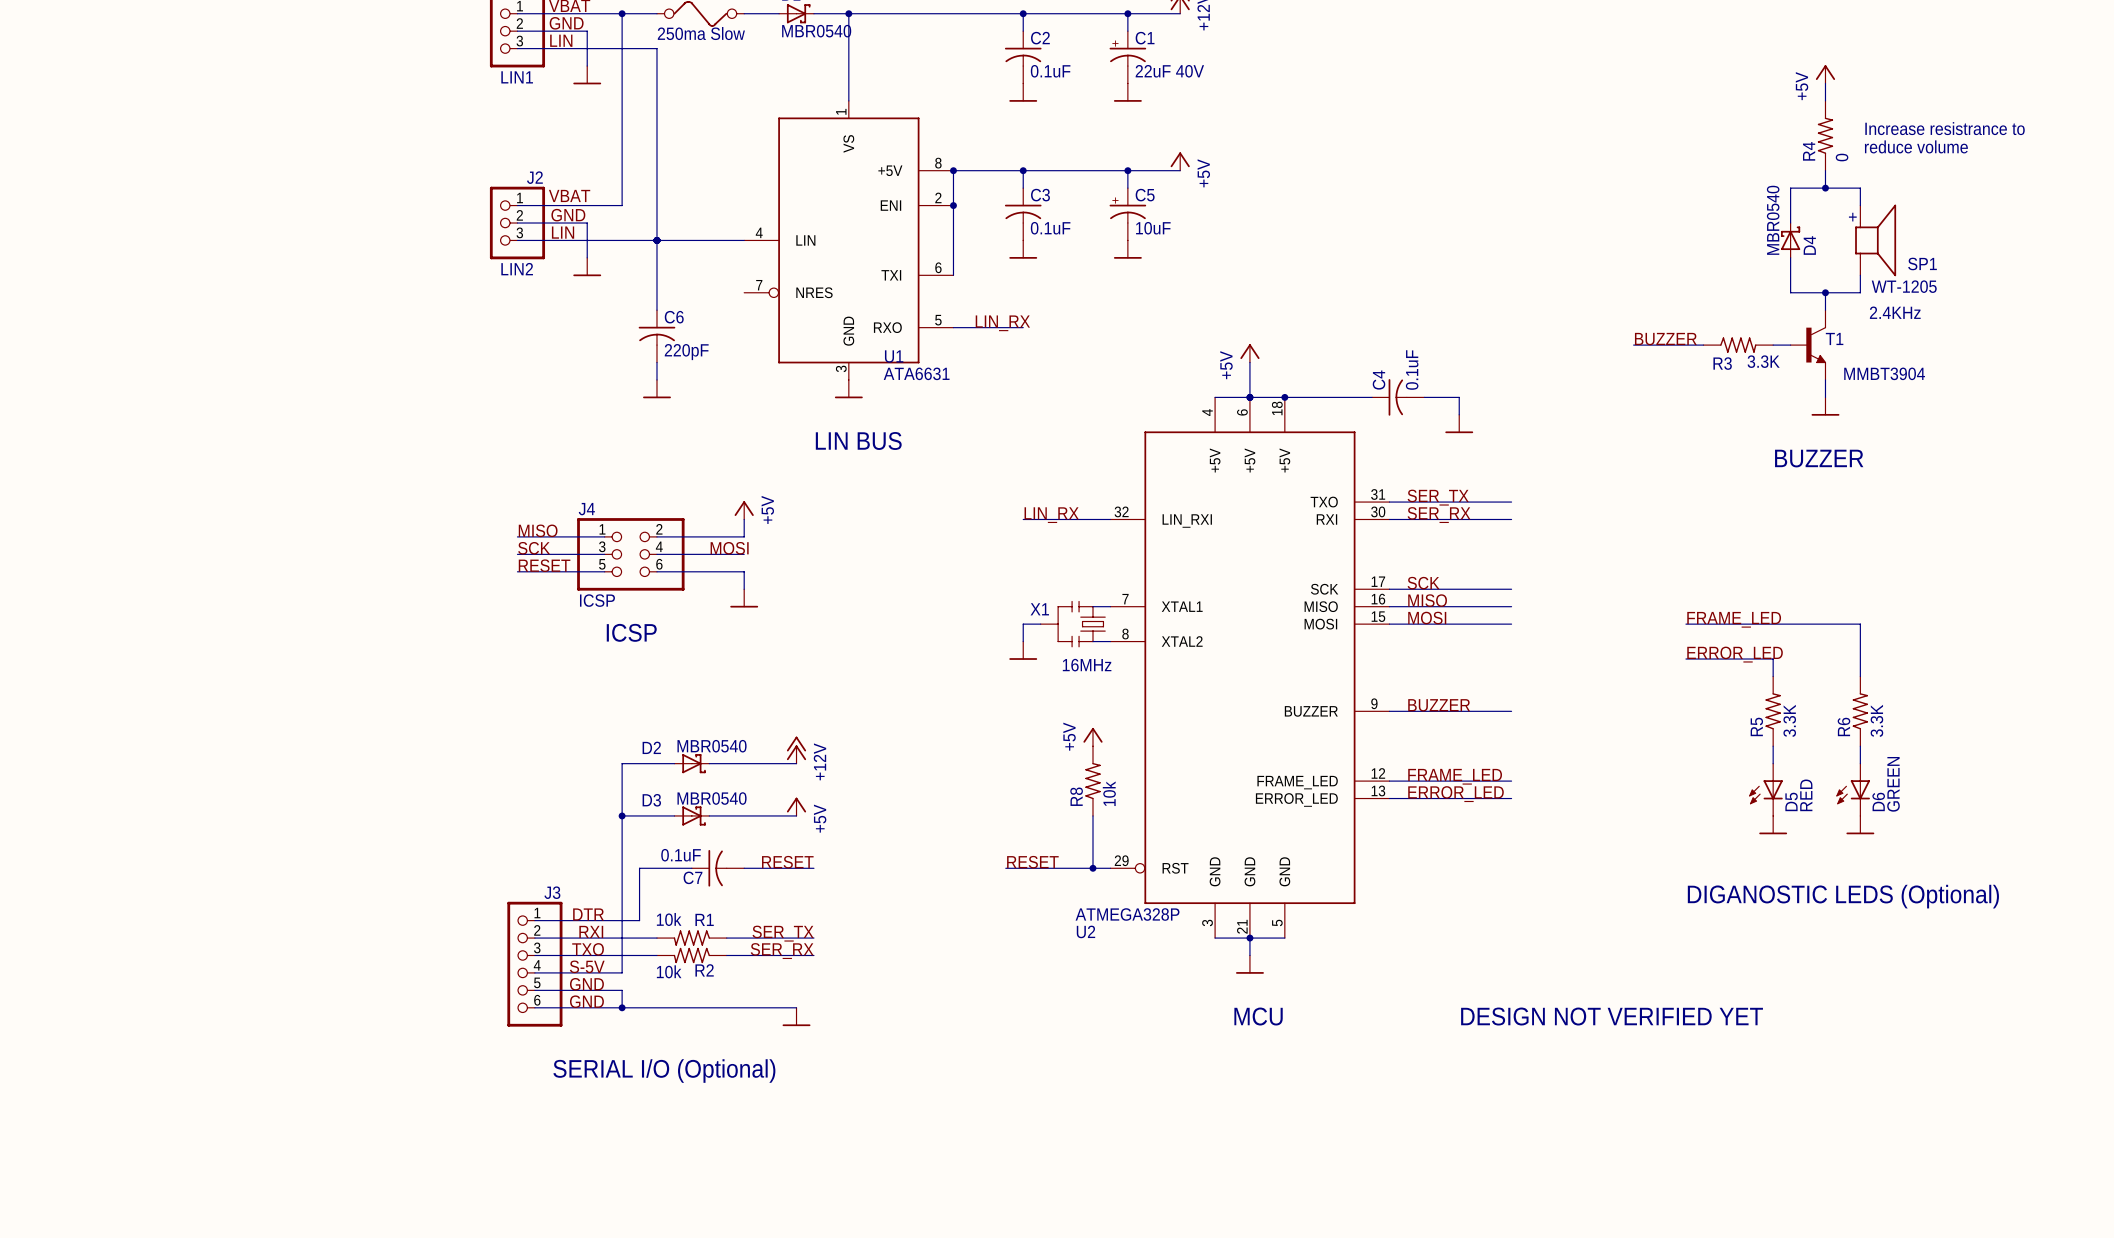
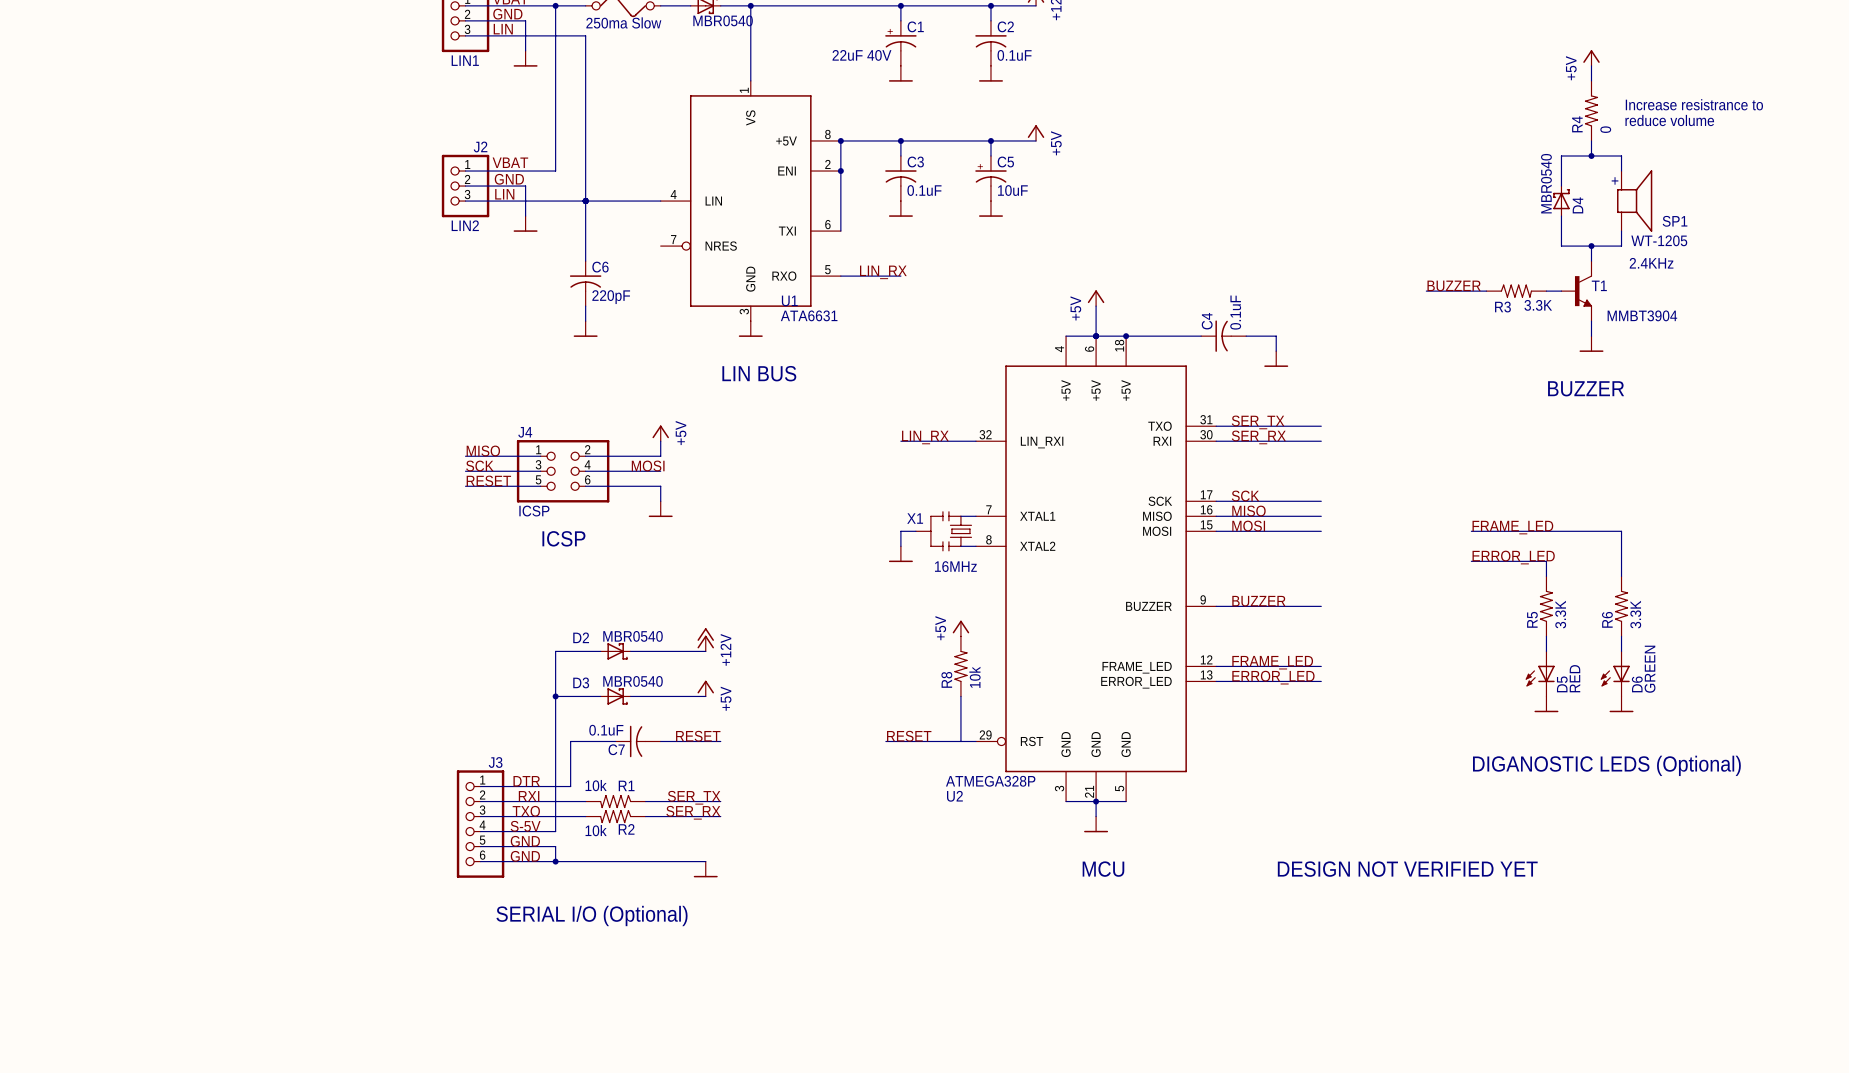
C2 symbol: [1004, 31, 1042, 84] -> [975, 20, 1007, 66]
C1 symbol: [1109, 31, 1147, 84] -> [885, 20, 917, 66]
C1 value position: 22uF 40V (1169, 71) -> 22uF 40V (861, 55)
junction: (1092, 868) -> none

